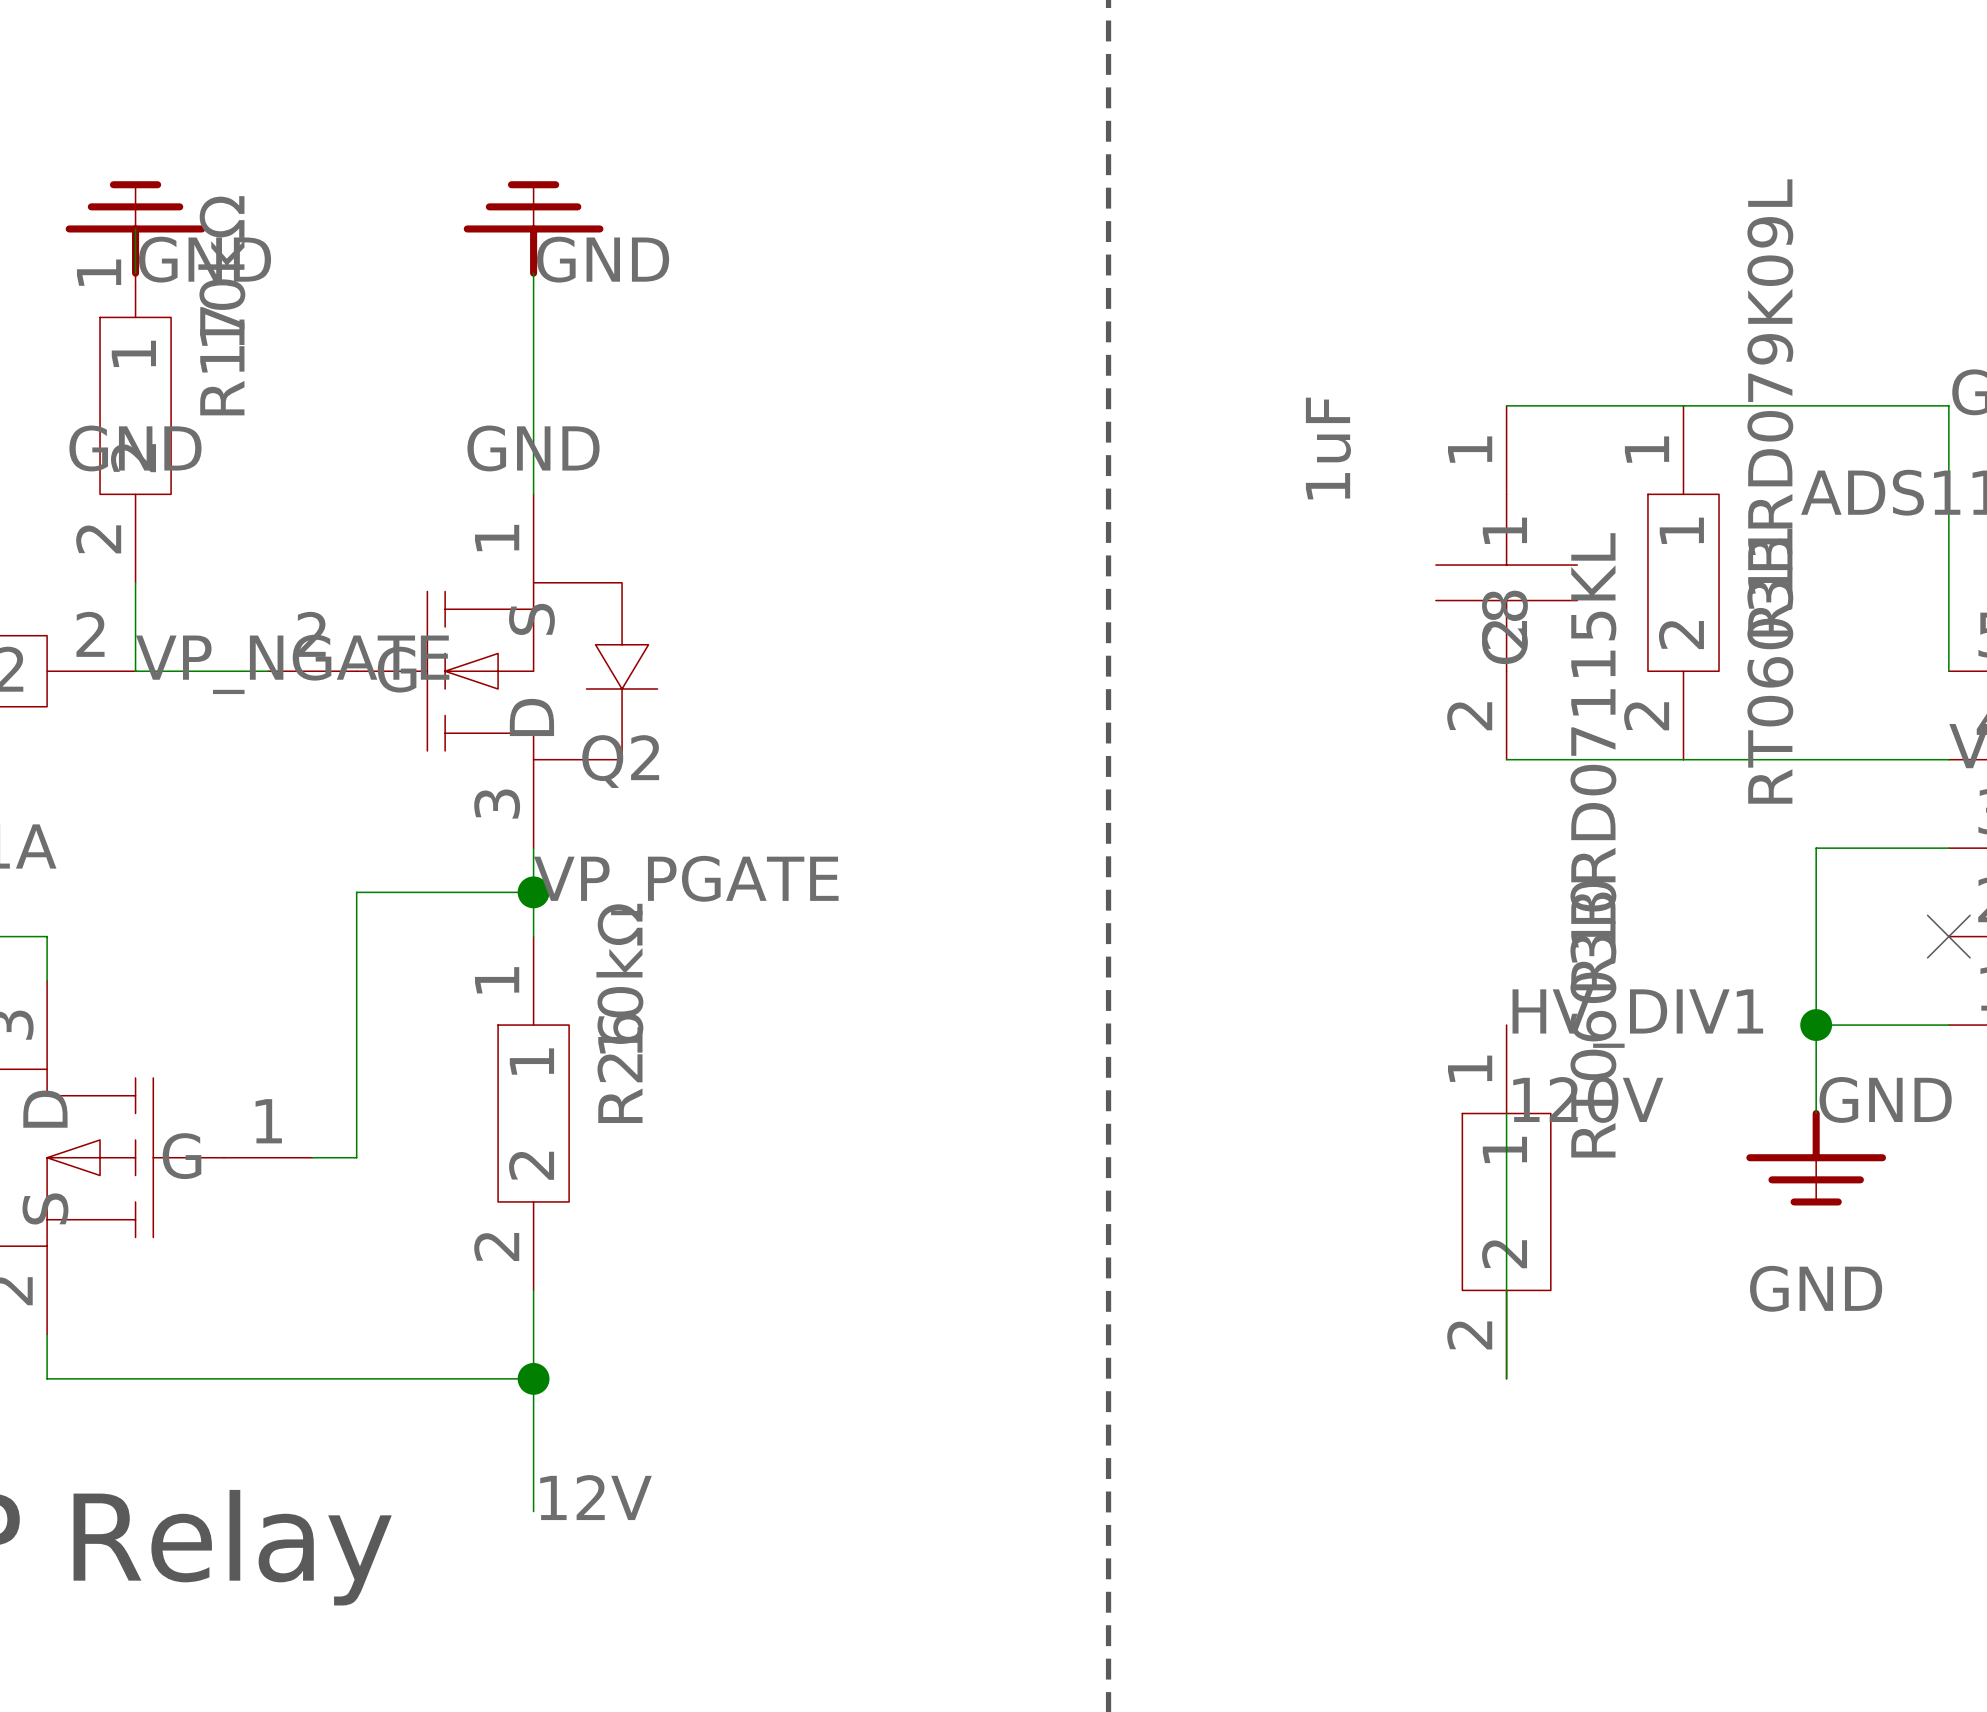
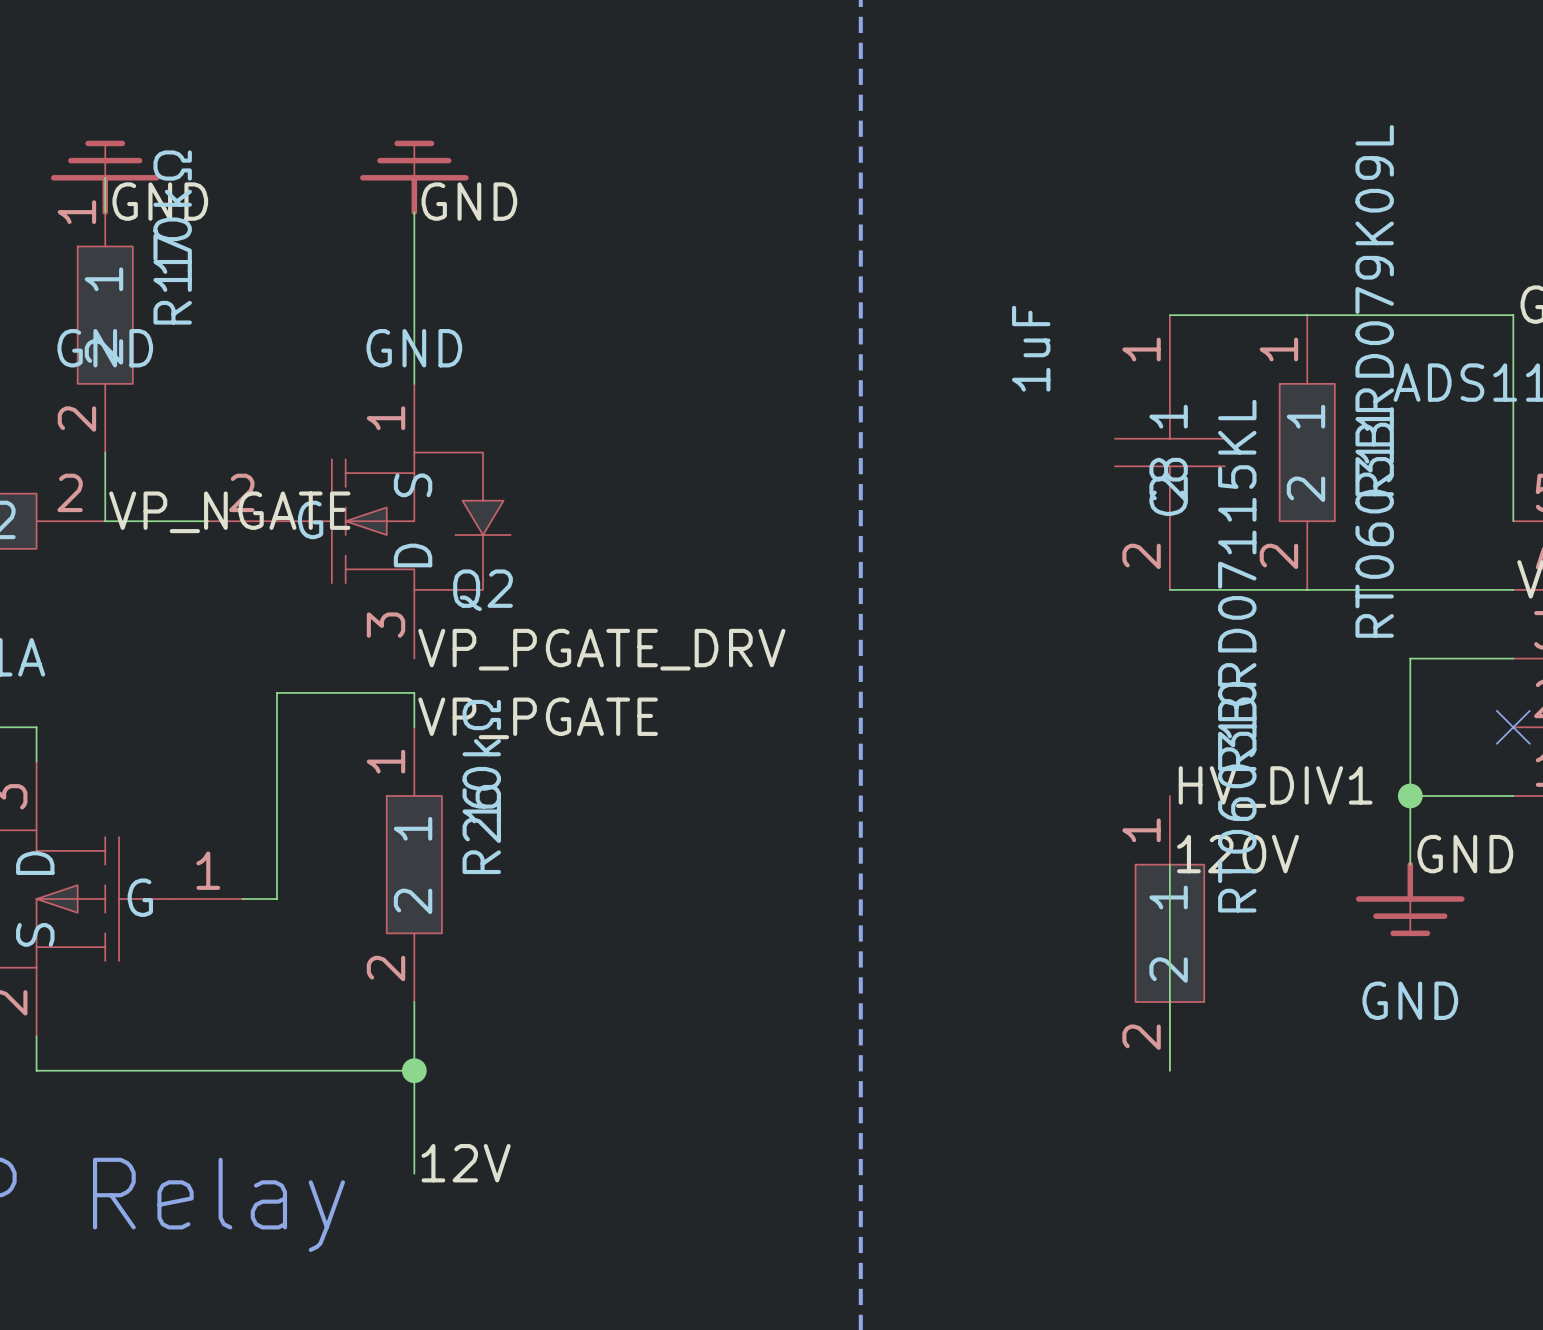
label: none -> VP_PGATE_DRV (601, 649)
wire: (533, 848) (533, 892) -> none
label position: VP_PGATE (686, 885) -> VP_PGATE (538, 718)
junction: (533, 892) -> none

